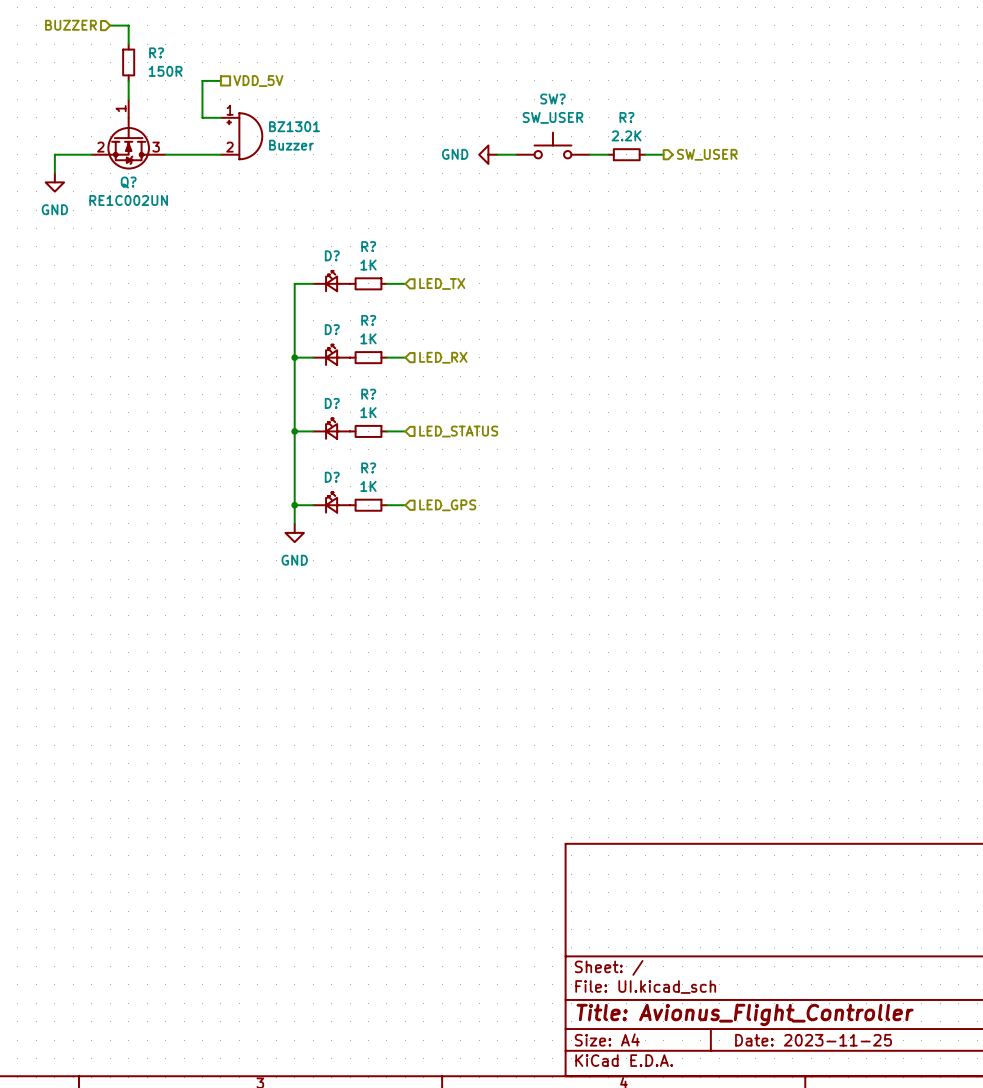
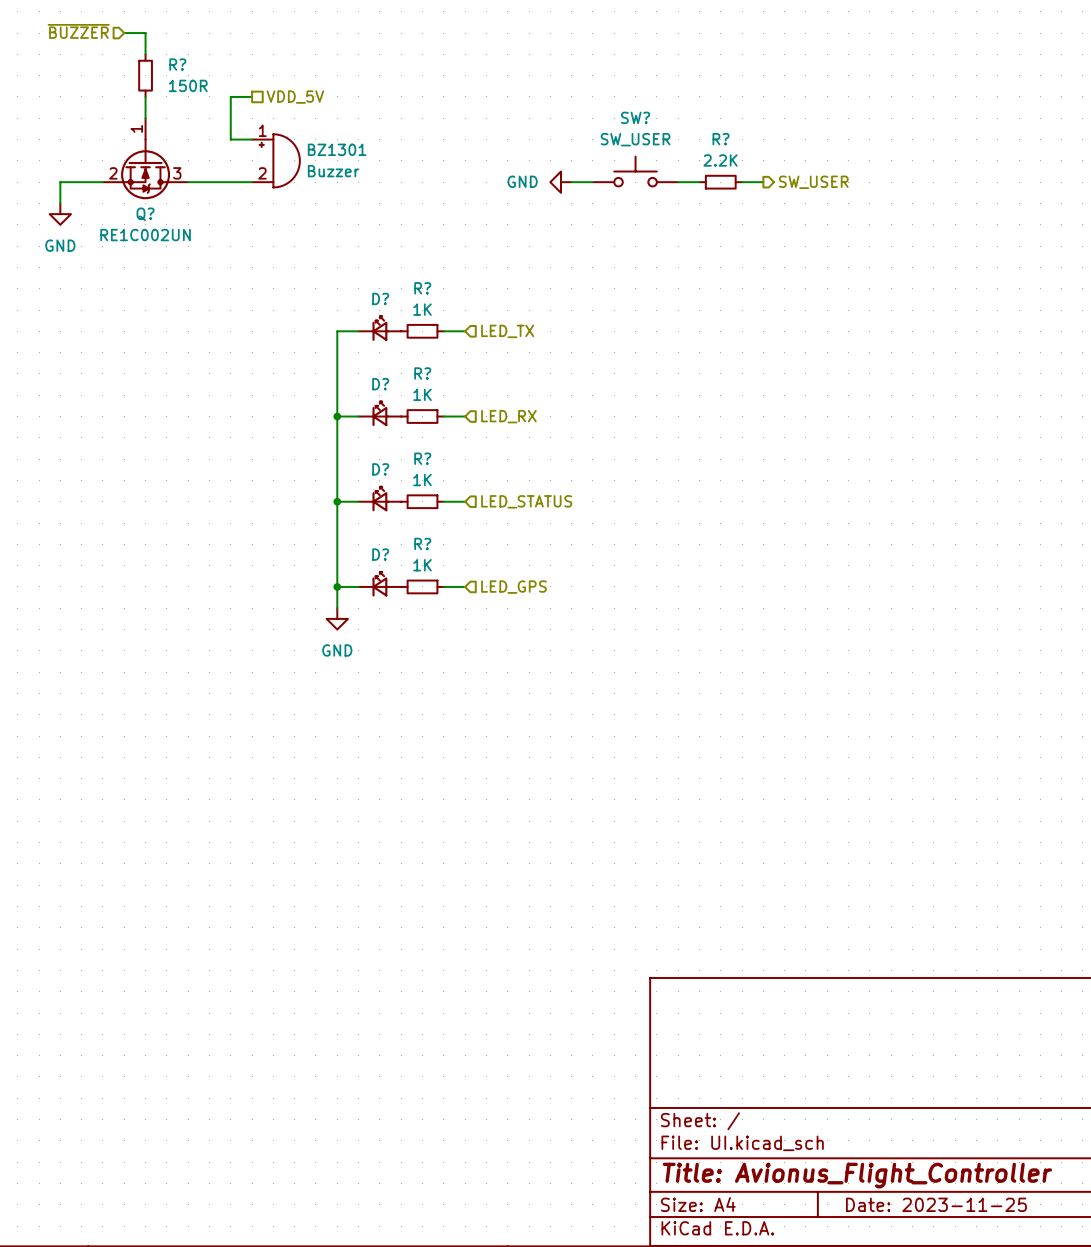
hierarchical label: BUZZER (70, 25) -> ~{BUZZER} (78, 31)

